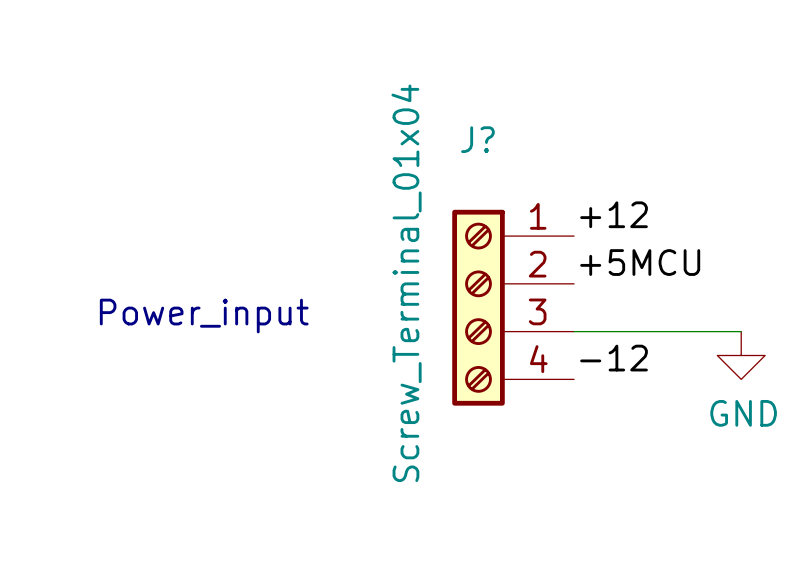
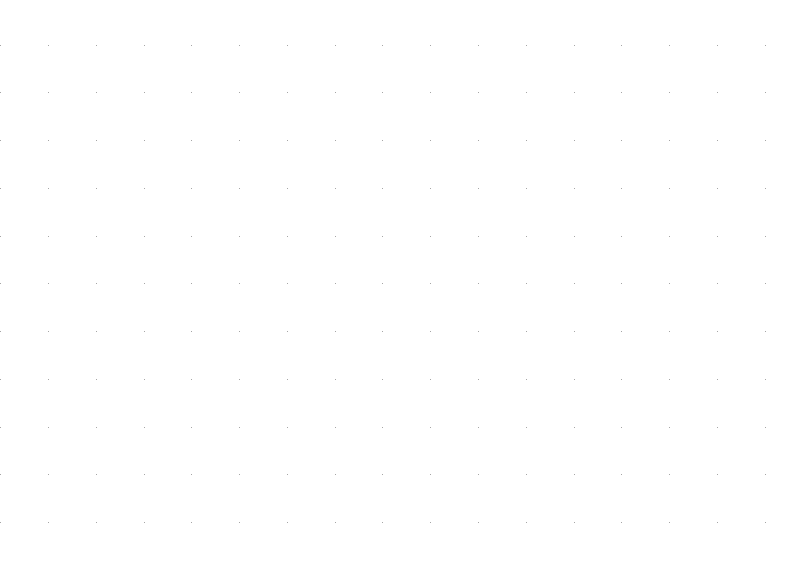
label: +12 (614, 214) -> none
label: +5MCU (640, 262) -> none
J?: Screw_Terminal_01x04 (513, 307) -> none
text: Power_input (204, 316) -> none
wire: (574, 331) (741, 331) -> none
power symbol: GND (741, 355) -> none
label: -12 (614, 358) -> none

